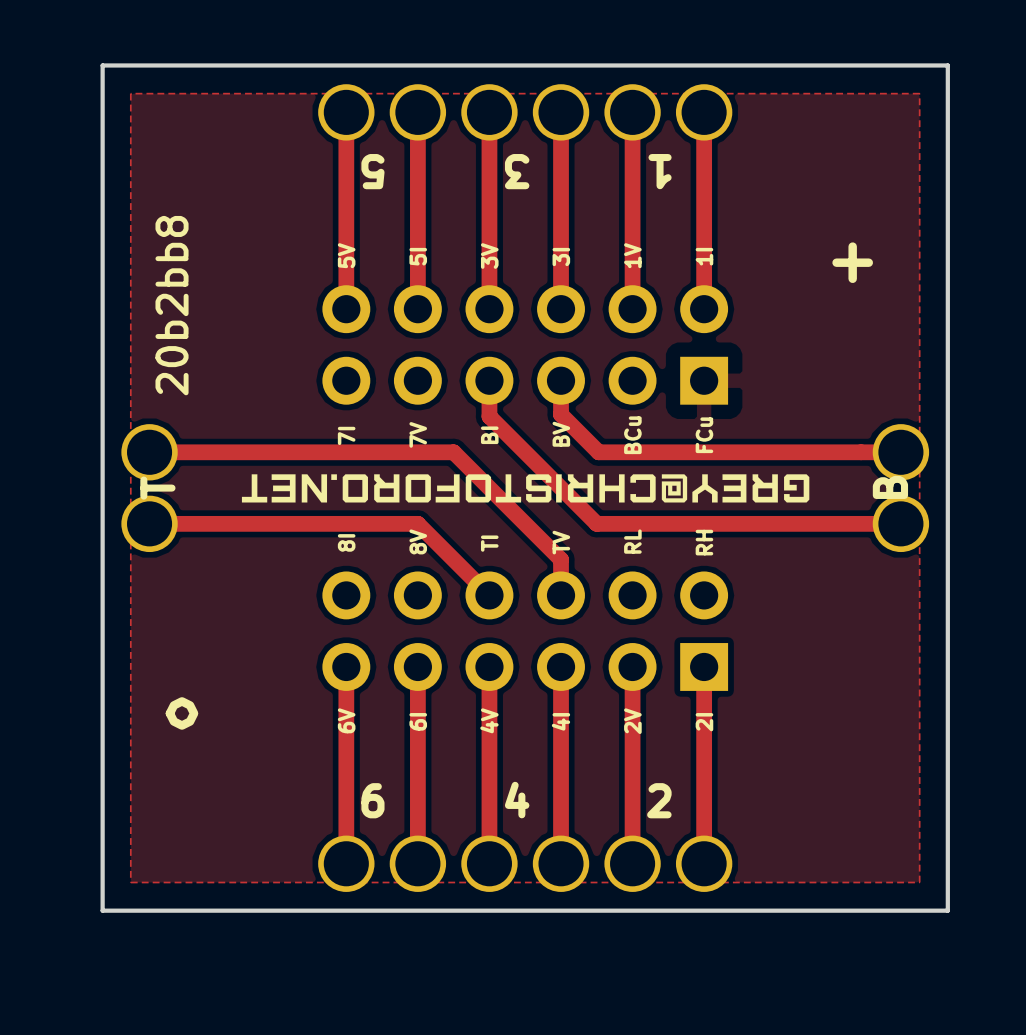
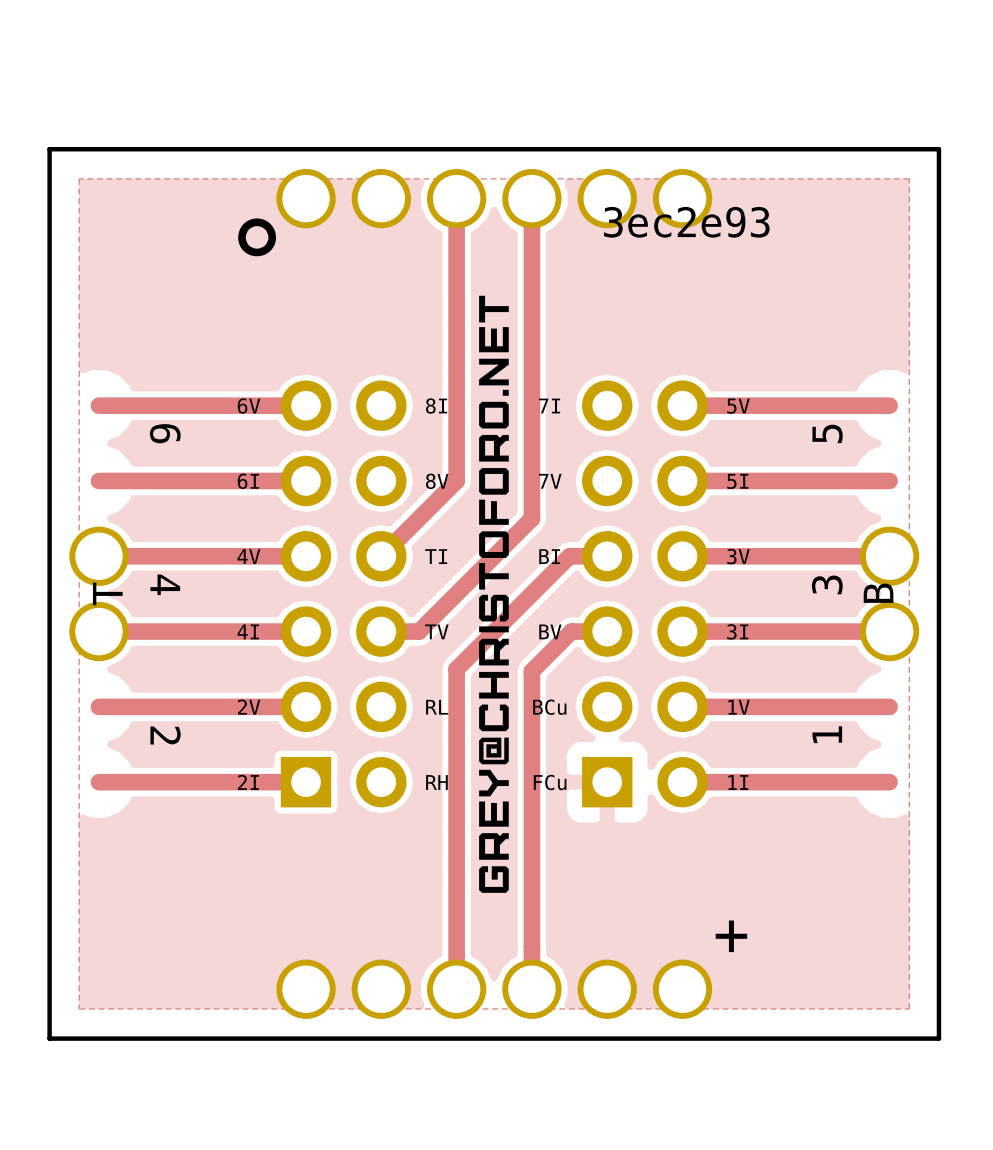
track: (346, 112) (346, 309) -> (98, 405) (306, 405)
track: (417, 112) (417, 309) -> none
track: (632, 112) (632, 309) -> none
track: (704, 112) (704, 309) -> (889, 405) (682, 405)
text: none -> 3ec2e93 (686, 222)
text rotation: 0° (372, 171) -> 90° clockwise (827, 433)
text position: 5 (372, 171) -> 5 (827, 433)
text rotation: 0° (517, 171) -> 90° clockwise (827, 584)
text position: 3 (517, 171) -> 3 (827, 584)
text rotation: 0° (660, 171) -> 90° clockwise (827, 734)
text position: 1 (660, 171) -> 1 (827, 734)
text rotation: 0° (346, 255) -> 90° clockwise (738, 406)
text position: 5V (346, 255) -> 5V (738, 406)
text rotation: 0° (632, 255) -> 90° clockwise (739, 707)
text position: 1V (632, 255) -> 1V (739, 707)
text rotation: 0° (418, 256) -> 90° clockwise (737, 481)
text position: 5I (418, 256) -> 5I (737, 481)
text rotation: 0° (489, 256) -> 90° clockwise (738, 556)
text position: 3V (489, 256) -> 3V (738, 556)
text rotation: 0° (704, 256) -> 90° clockwise (738, 782)
text position: 1I (704, 256) -> 1I (738, 782)
text rotation: 0° (561, 257) -> 90° clockwise (737, 631)
text position: 3I (561, 257) -> 3I (737, 631)
text rotation: 0° (852, 262) -> 90° clockwise (731, 936)
text position: + (852, 262) -> + (731, 936)
text: 20b2bb8 (172, 305) -> none
track: none -> (456, 405) (456, 480) (381, 556)
track: none -> (531, 405) (531, 480)
part: (525, 344) -> none
track: none -> (98, 480) (306, 480)
track: (489, 380) (489, 416) (598, 523) -> (531, 671) (571, 631)
track: none -> (682, 480) (889, 480)
track: (561, 414) (598, 452) -> (531, 516) (418, 631) (381, 631)
text rotation: 0° (418, 434) -> 90° clockwise (550, 481)
text position: 7V (418, 434) -> 7V (550, 481)
text rotation: 0° (561, 434) -> 90° clockwise (550, 631)
text position: BV (561, 434) -> BV (550, 631)
text rotation: 0° (346, 435) -> 90° clockwise (549, 406)
text position: 7I (346, 435) -> 7I (549, 406)
text rotation: 0° (489, 435) -> 90° clockwise (549, 556)
text position: BI (489, 435) -> BI (549, 556)
text rotation: 0° (632, 435) -> 90° clockwise (549, 707)
text position: BCu (632, 435) -> BCu (549, 707)
text rotation: 0° (704, 435) -> 90° clockwise (550, 782)
text position: FCu (704, 435) -> FCu (550, 782)
track: (346, 452) (453, 452) (561, 561) -> none
track: none -> (571, 556) (456, 669) (456, 782)
track: (632, 452) (704, 452) -> none
drawing shape: [241, 474, 810, 503] -> [479, 295, 509, 893]
part: none -> (343, 593)
part: none -> (644, 593)
track: (346, 523) (417, 523) (489, 595) -> none
track: (632, 523) (704, 523) -> none
text rotation: 0° (418, 541) -> 90° clockwise (437, 481)
text position: 8V (418, 541) -> 8V (437, 481)
text rotation: 0° (632, 541) -> 90° clockwise (437, 707)
text position: RL (632, 541) -> RL (437, 707)
text rotation: 0° (346, 542) -> 90° clockwise (436, 406)
text position: 8I (346, 542) -> 8I (436, 406)
text rotation: 0° (561, 542) -> 90° clockwise (436, 631)
text position: TV (561, 542) -> TV (436, 631)
text rotation: 0° (704, 542) -> 90° clockwise (436, 782)
text position: RH (704, 542) -> RH (436, 782)
text rotation: 0° (489, 543) -> 90° clockwise (436, 556)
text position: TI (489, 543) -> TI (436, 556)
track: none -> (98, 706) (306, 706)
track: none -> (531, 706) (531, 782)
track: none -> (682, 706) (889, 706)
part: (525, 631) -> none
track: (346, 666) (346, 863) -> (306, 782) (98, 782)
track: (417, 666) (417, 863) -> none
track: (632, 666) (632, 863) -> none
track: (704, 666) (704, 863) -> (682, 782) (889, 782)
text rotation: 0° (181, 713) -> 90° clockwise (257, 237)
text position: ° (181, 713) -> ° (257, 237)
text rotation: 0° (346, 720) -> 90° clockwise (249, 406)
text position: 6V (346, 720) -> 6V (249, 406)
text rotation: 0° (489, 720) -> 90° clockwise (248, 556)
text position: 4V (489, 720) -> 4V (248, 556)
text rotation: 0° (418, 721) -> 90° clockwise (248, 481)
text position: 6I (418, 721) -> 6I (248, 481)
text rotation: 0° (561, 721) -> 90° clockwise (248, 631)
text position: 4I (561, 721) -> 4I (248, 631)
text rotation: 0° (632, 721) -> 90° clockwise (249, 707)
text position: 2V (632, 721) -> 2V (249, 707)
text rotation: 0° (704, 722) -> 90° clockwise (248, 782)
text position: 2I (704, 722) -> 2I (248, 782)
text rotation: 0° (372, 800) -> 90° clockwise (165, 433)
text position: 6 (372, 800) -> 6 (165, 433)
text rotation: 0° (517, 800) -> 90° clockwise (165, 584)
text position: 4 (517, 800) -> 4 (165, 584)
text rotation: 0° (659, 800) -> 90° clockwise (165, 735)
text position: 2 (659, 800) -> 2 (165, 735)

